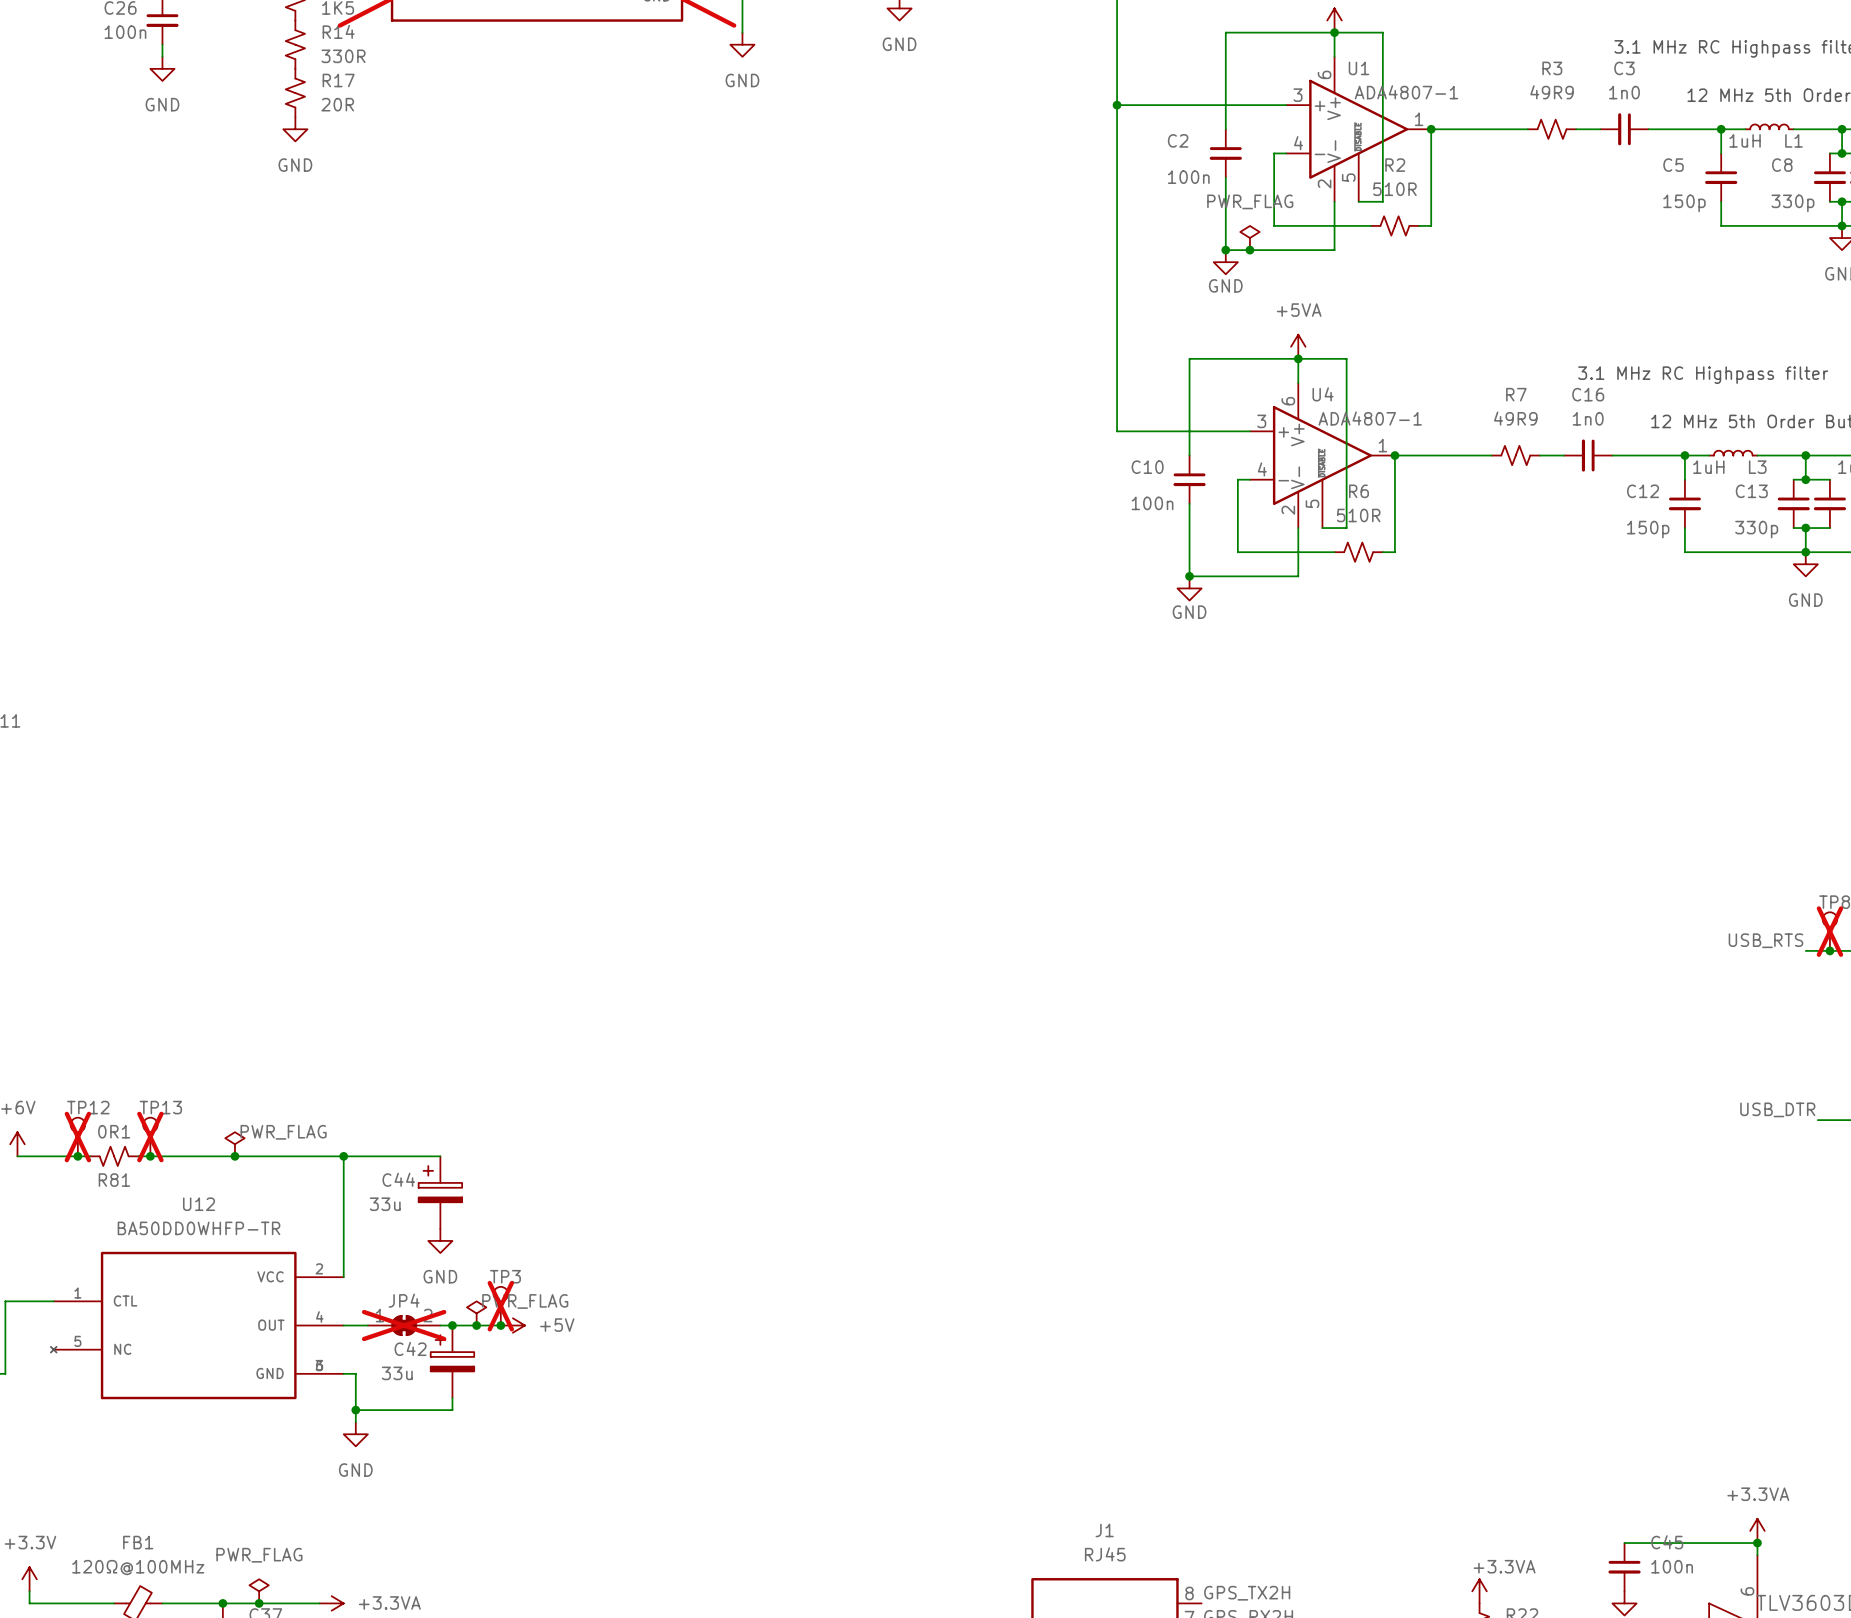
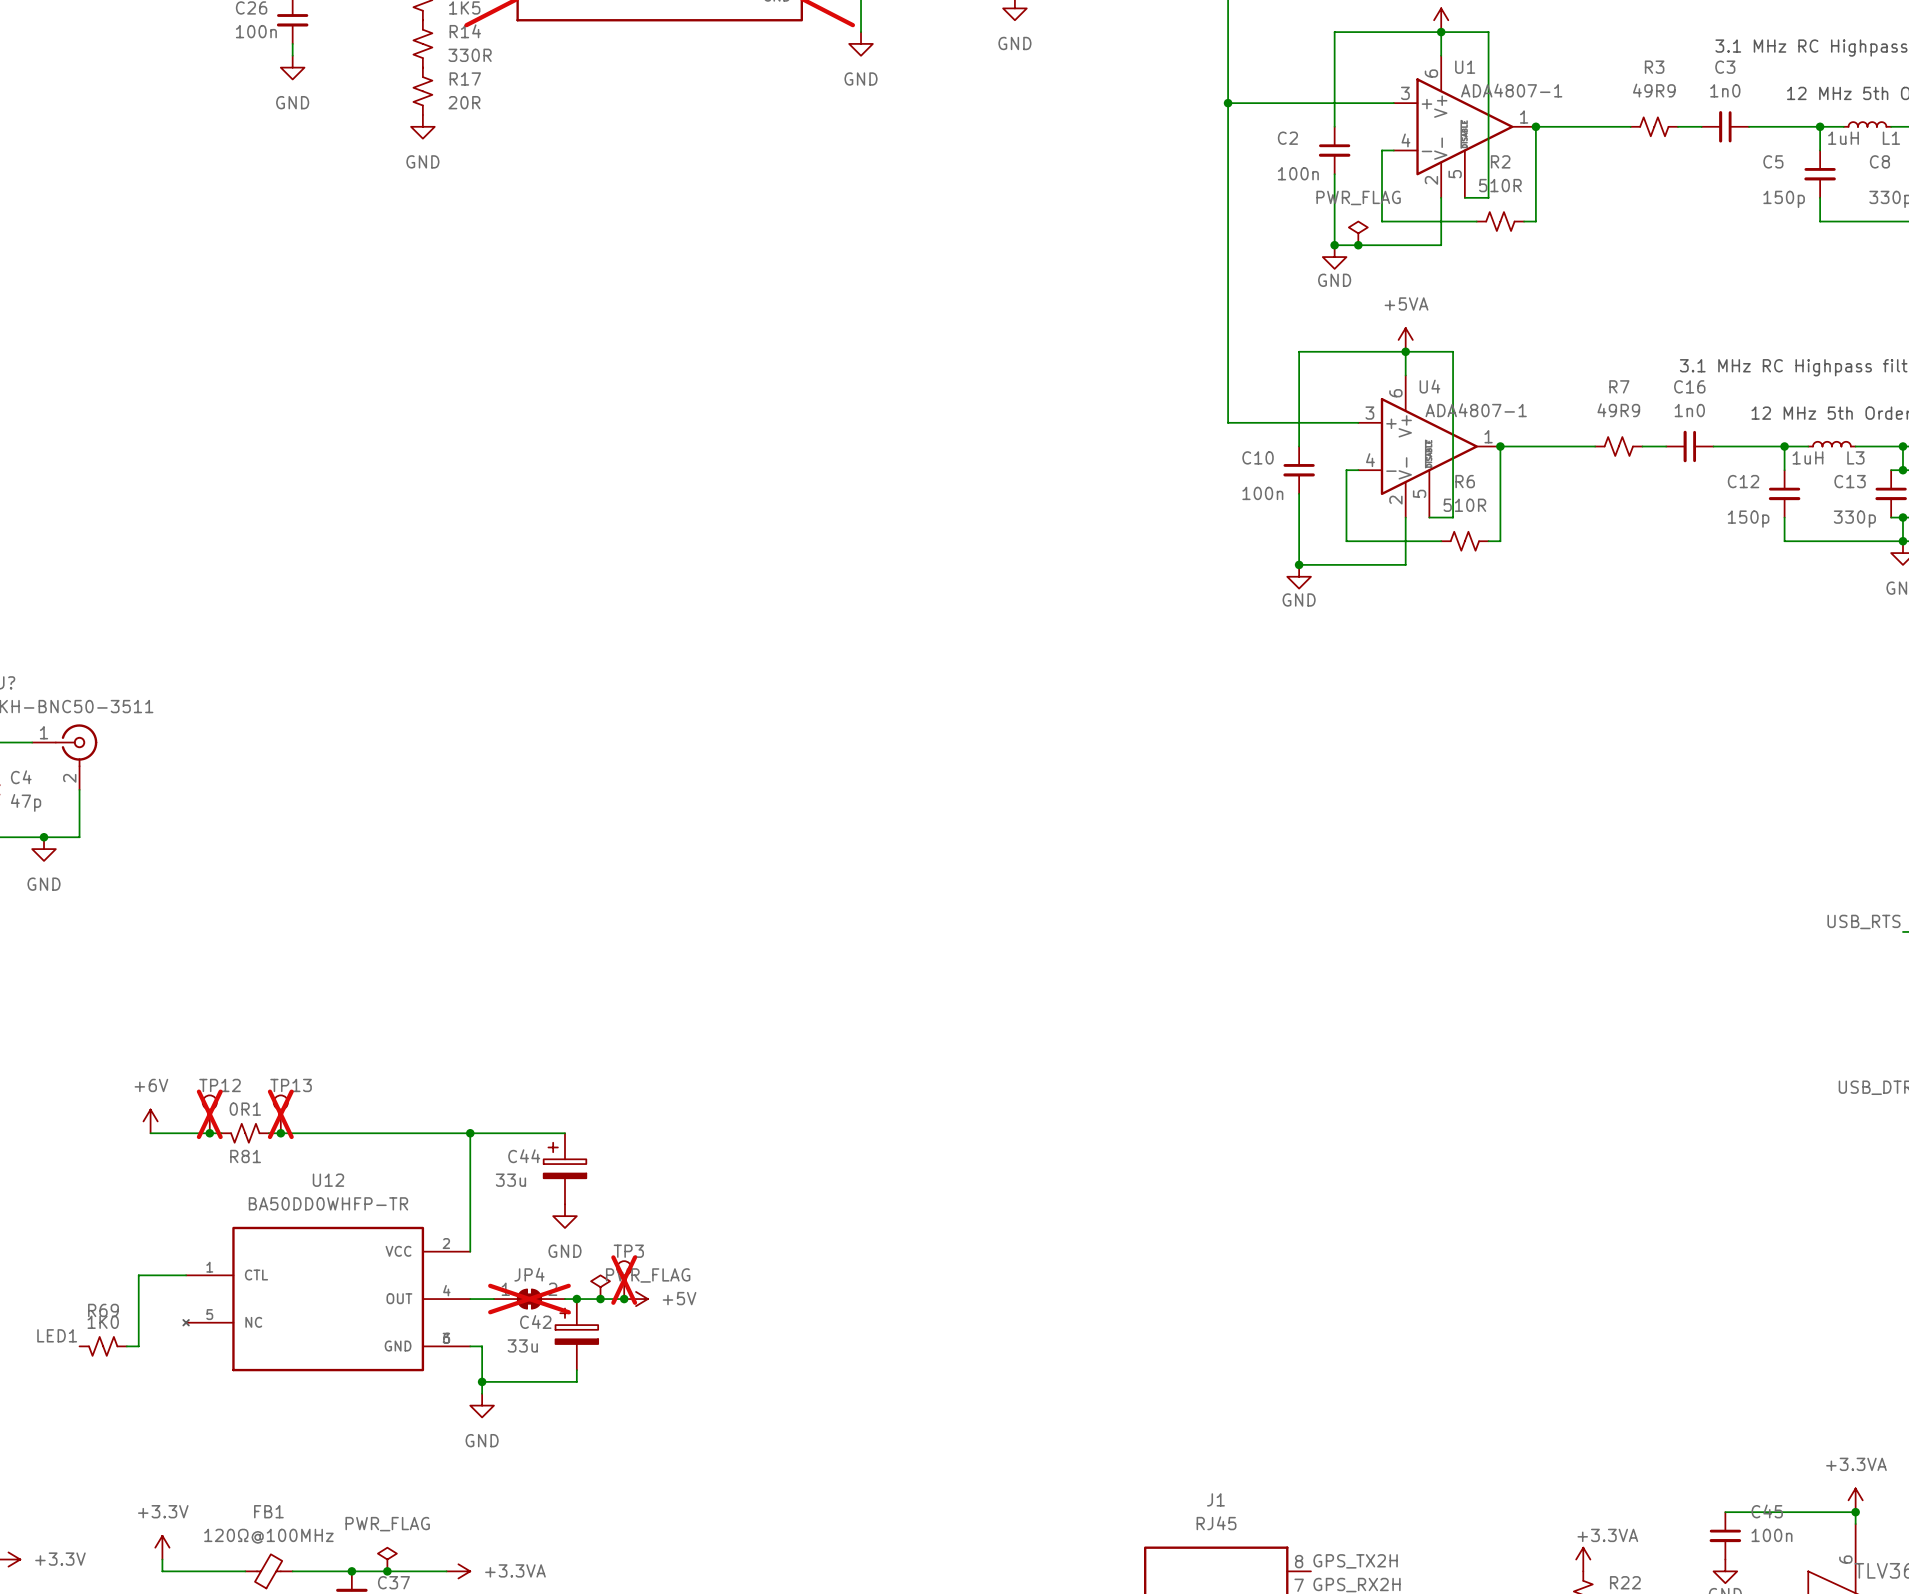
power symbol: PWR_FLAG (234, 1144) -> none
junction: (234, 1156) -> none

